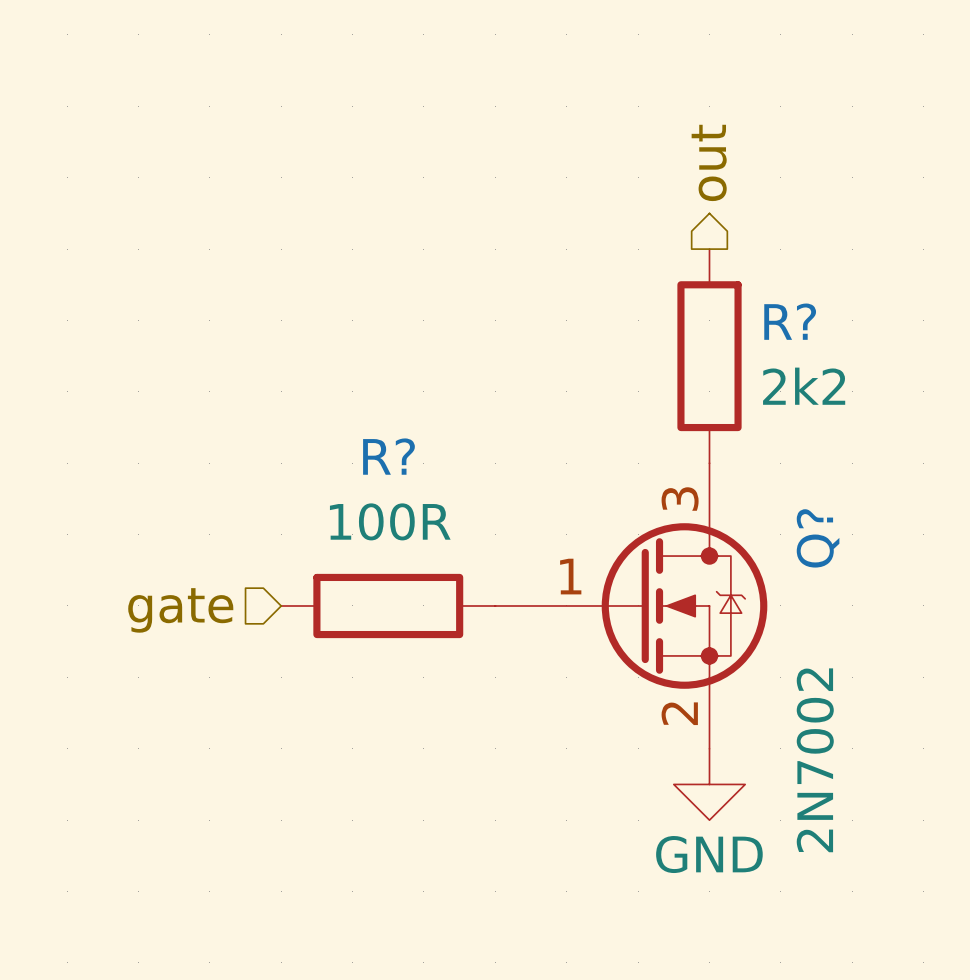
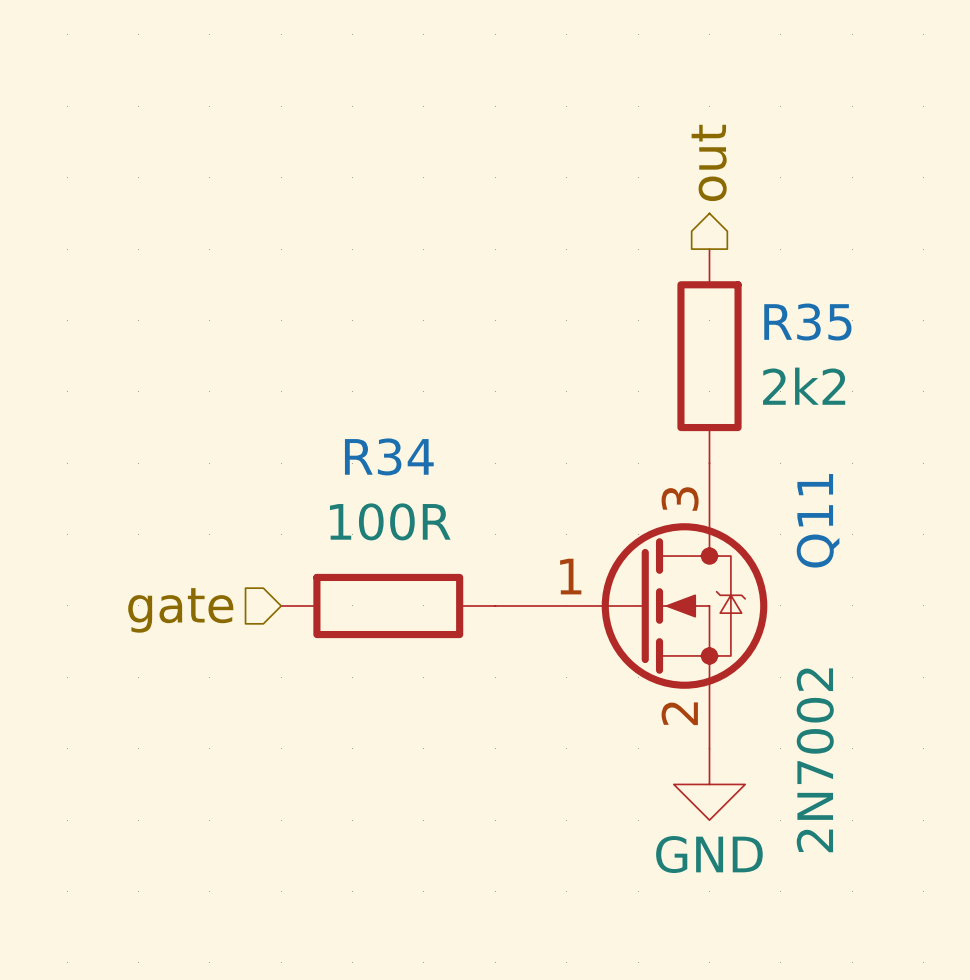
R? name: R? (790, 321) -> R35 (807, 322)
R? name: R? (388, 456) -> R34 (389, 456)
Q? name: Q? (818, 538) -> Q11 (818, 520)

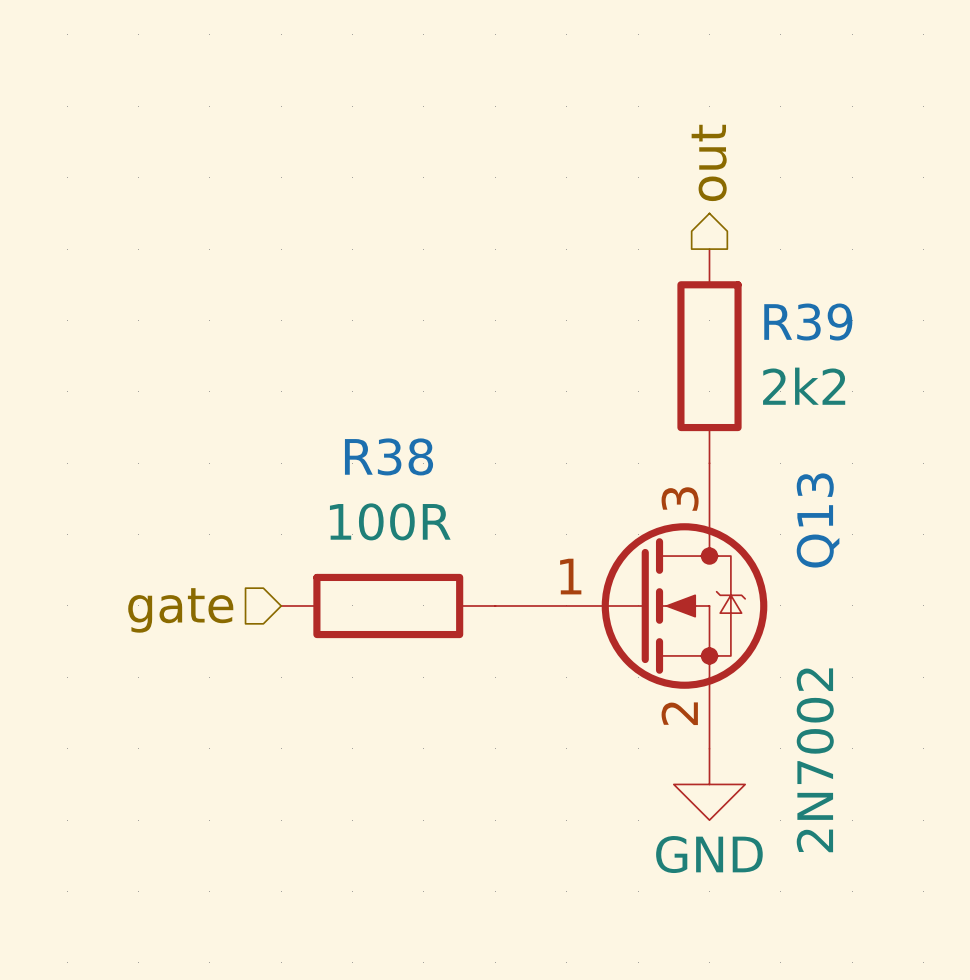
R35 name: R35 (807, 322) -> R39 (808, 322)
R34 name: R34 (389, 456) -> R38 (389, 456)
Q11 name: Q11 (818, 520) -> Q13 (818, 520)

